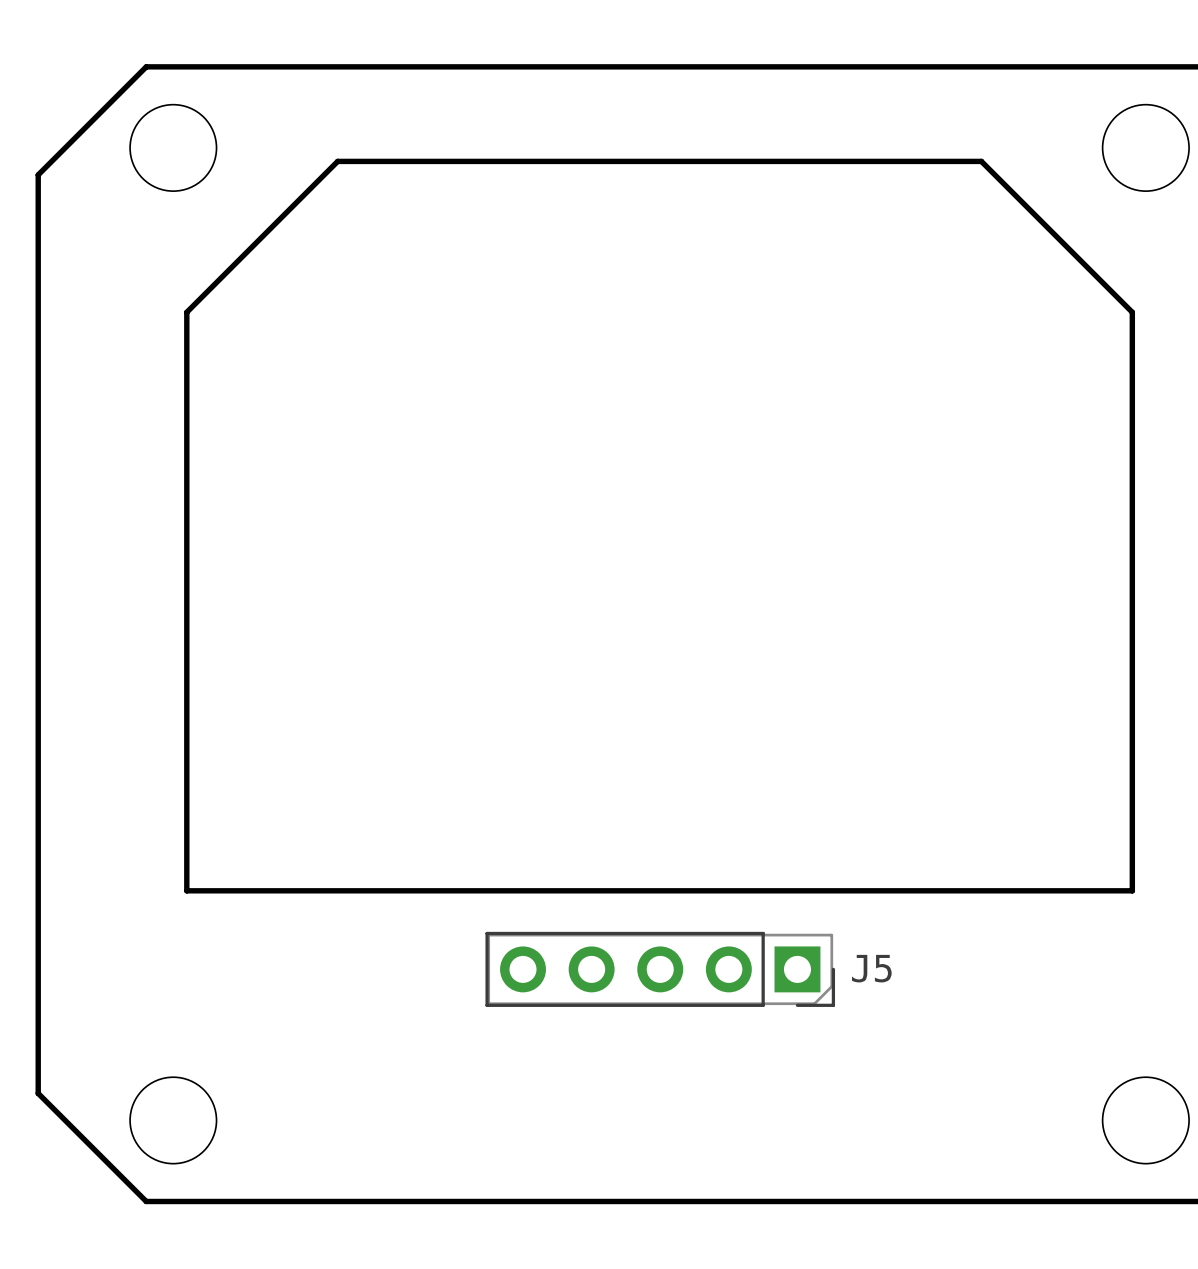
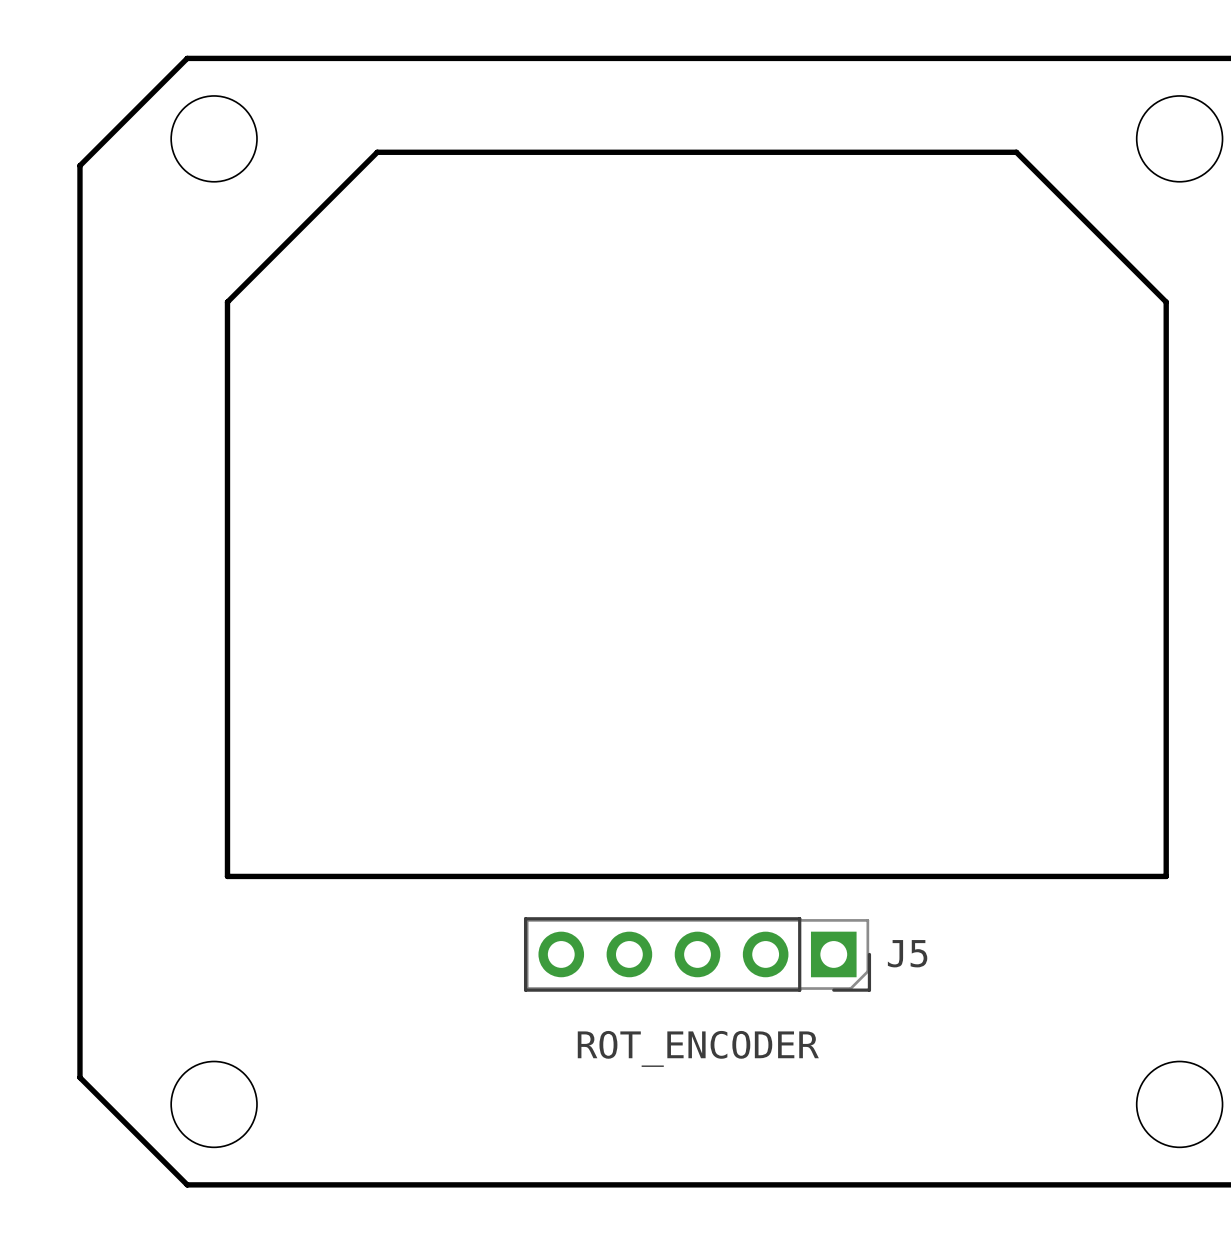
J5 value: none -> ROT_ENCODER (698, 1048)

